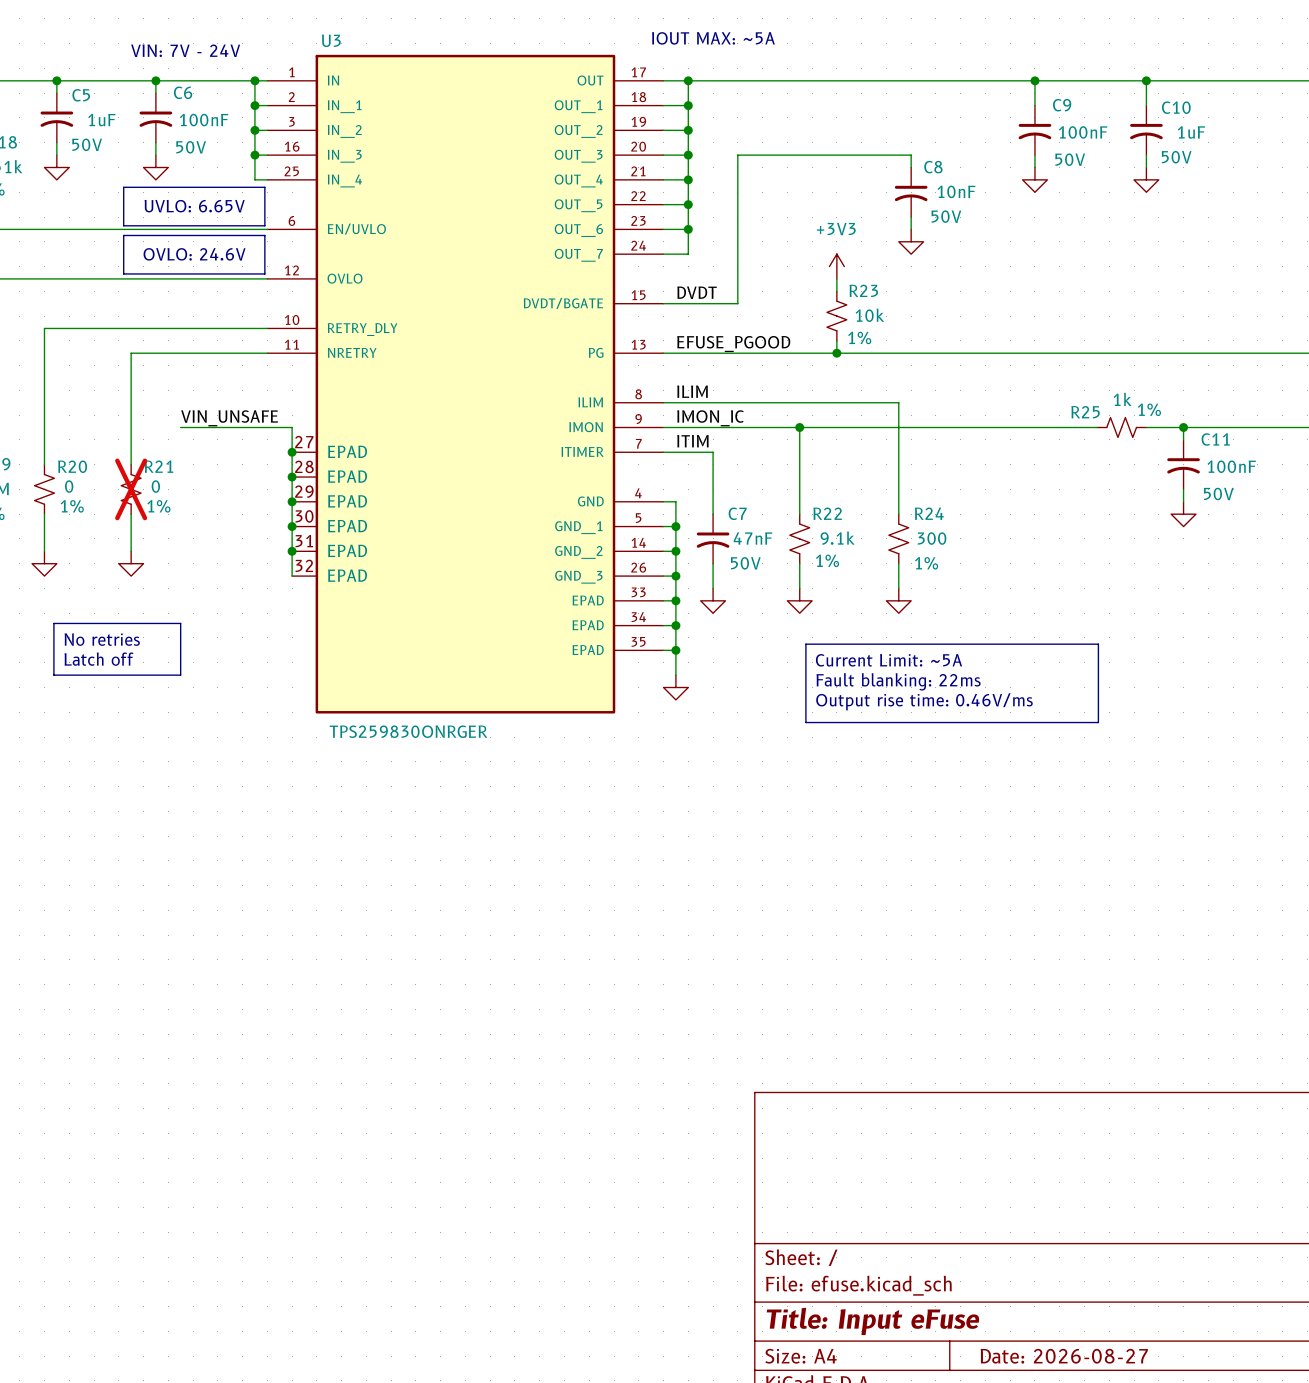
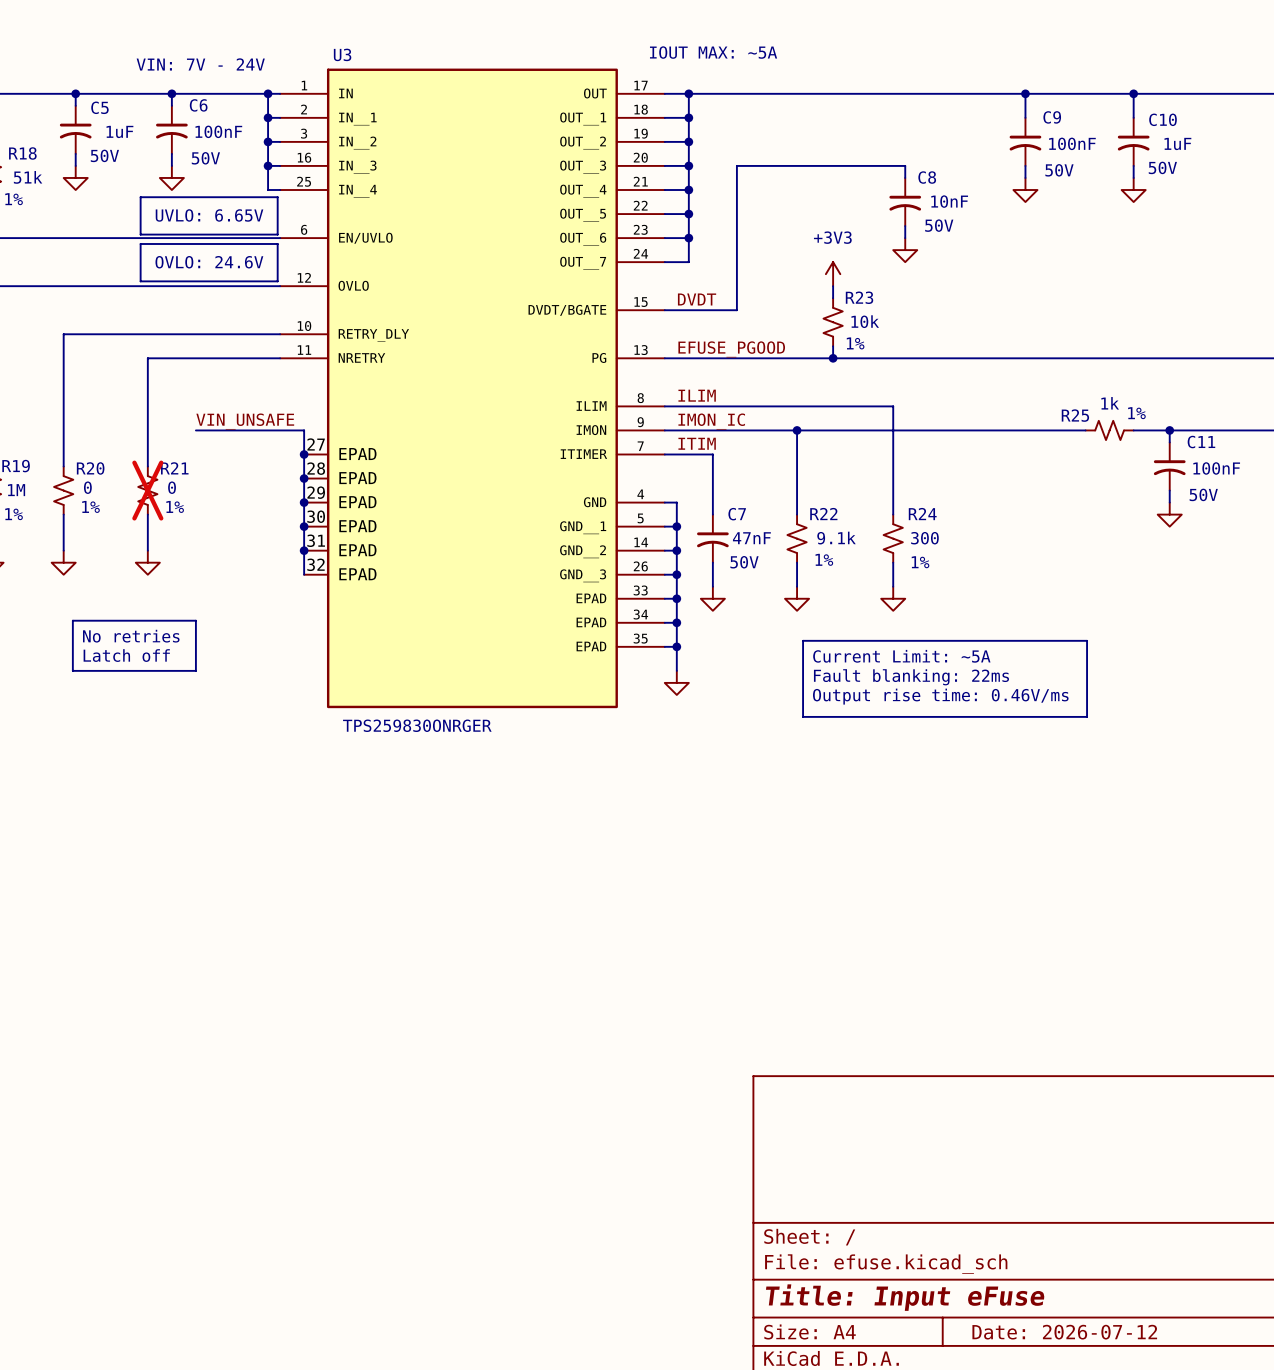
title block: Date: 2026-08-27 (1064, 1356) -> Date: 2026-07-12 (1064, 1332)

